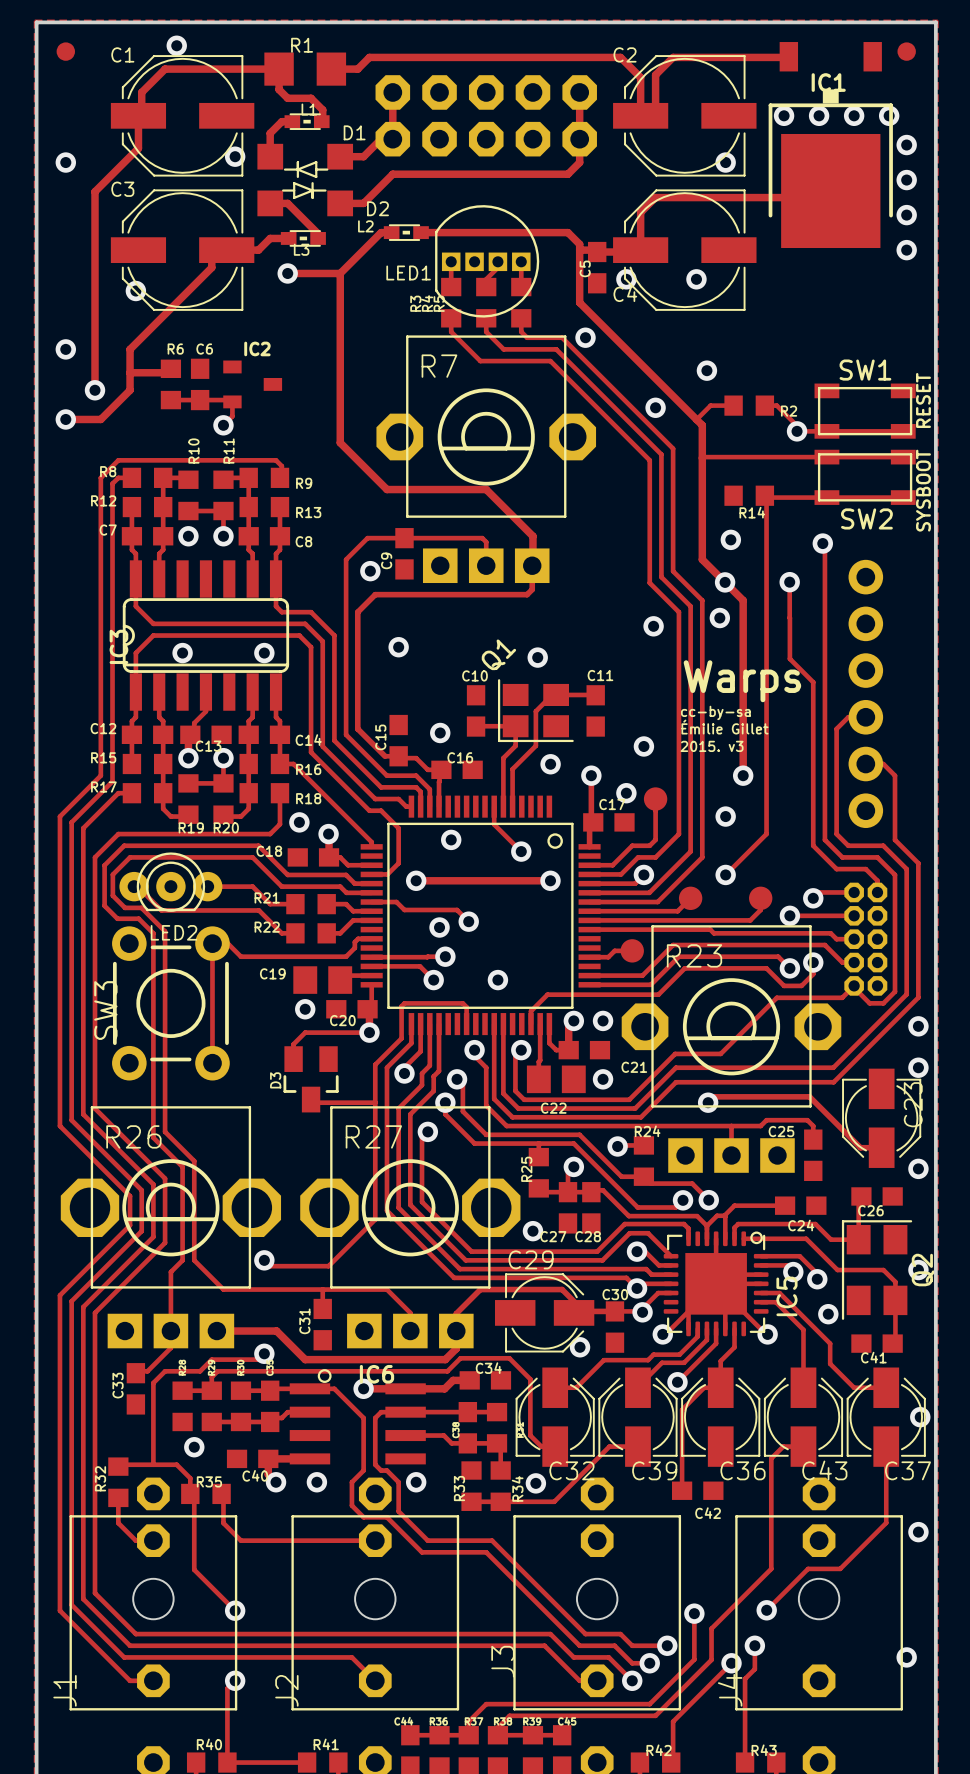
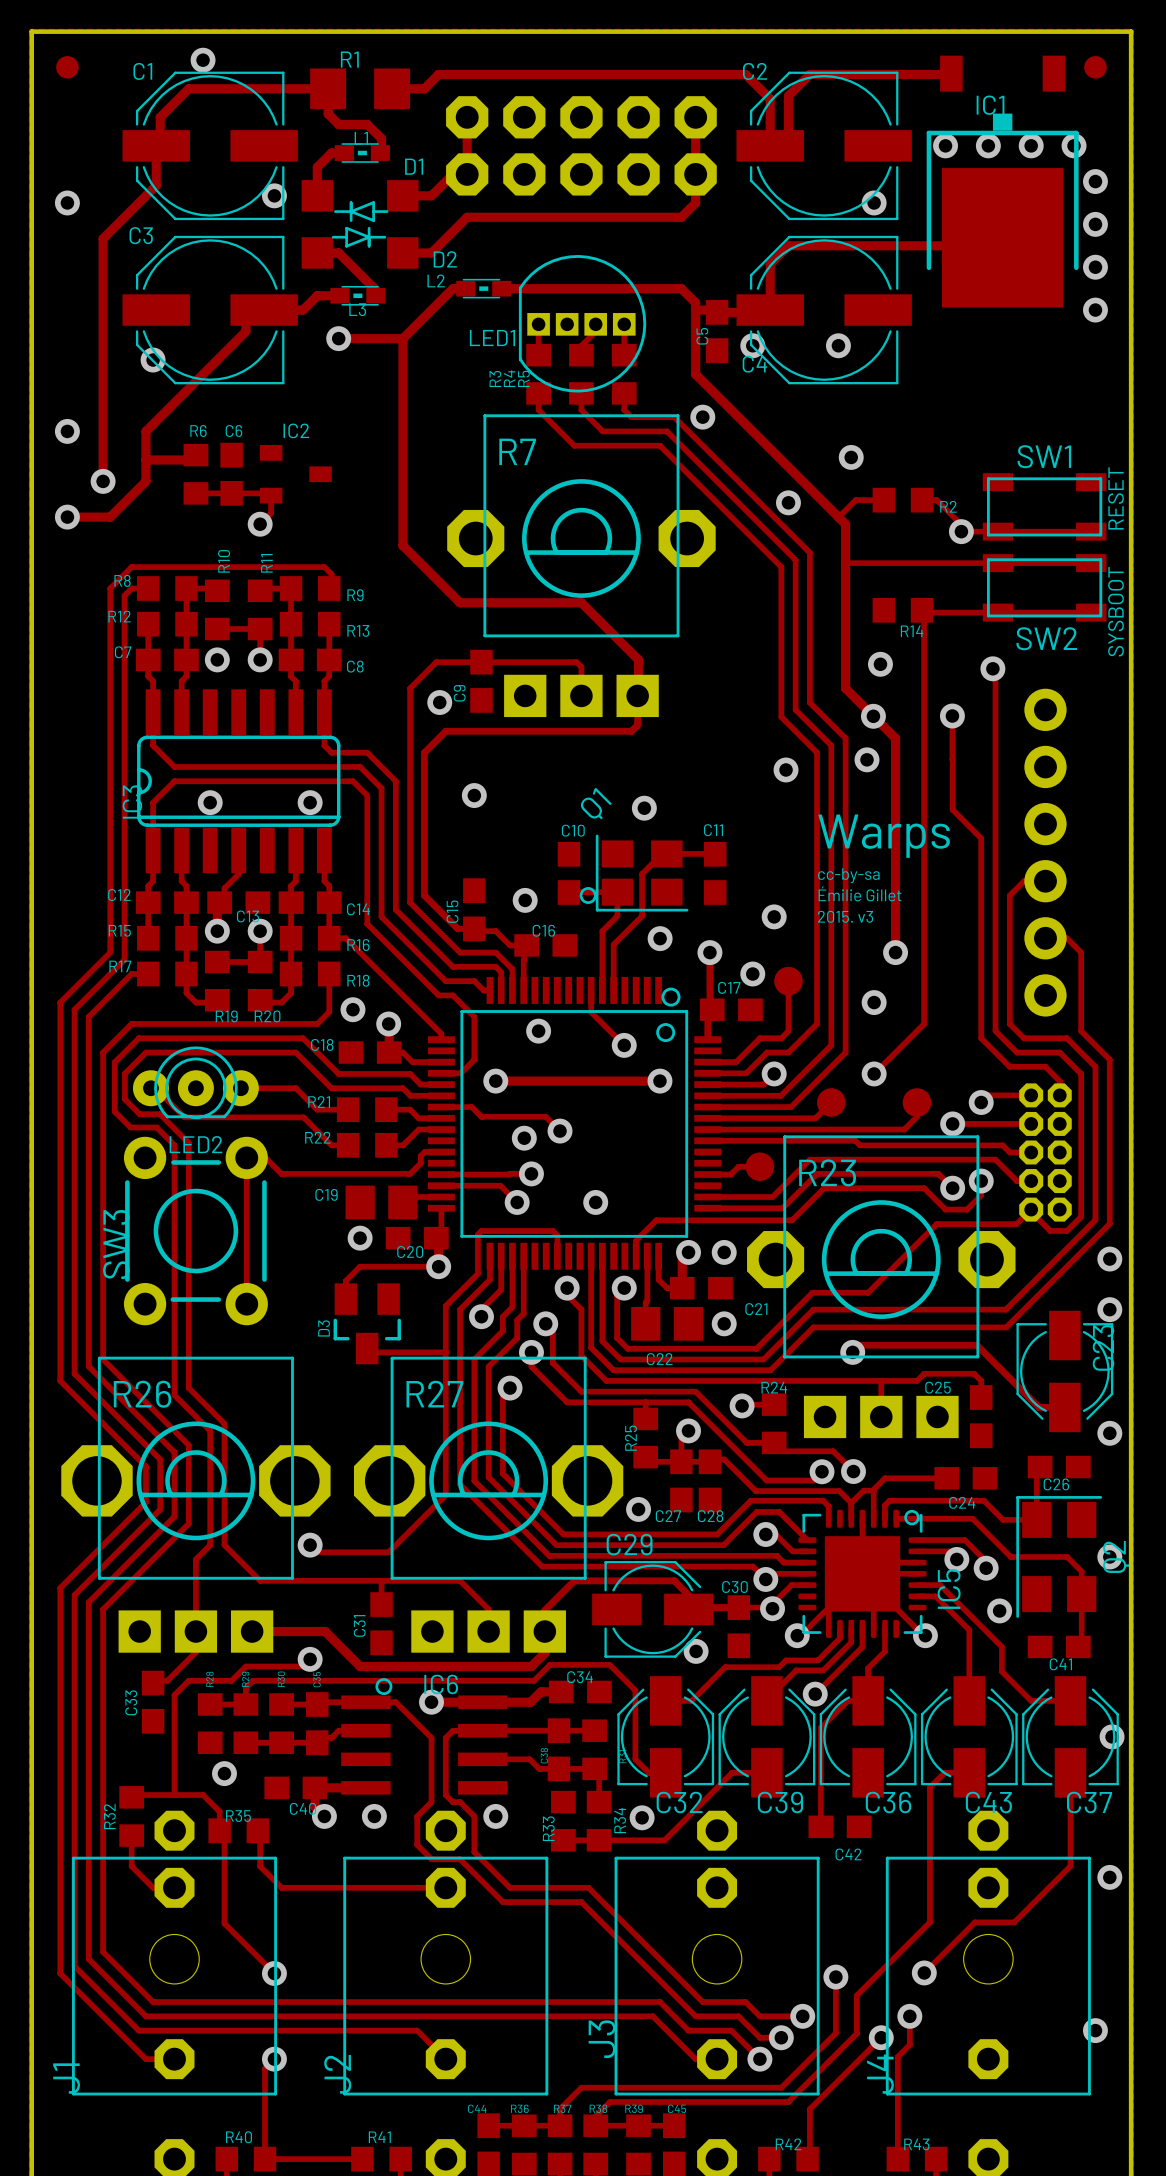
Q1 footprint: [498, 679, 574, 743] -> [579, 834, 689, 912]
part footprint: [360, 795, 601, 1036] -> [427, 976, 722, 1270]

